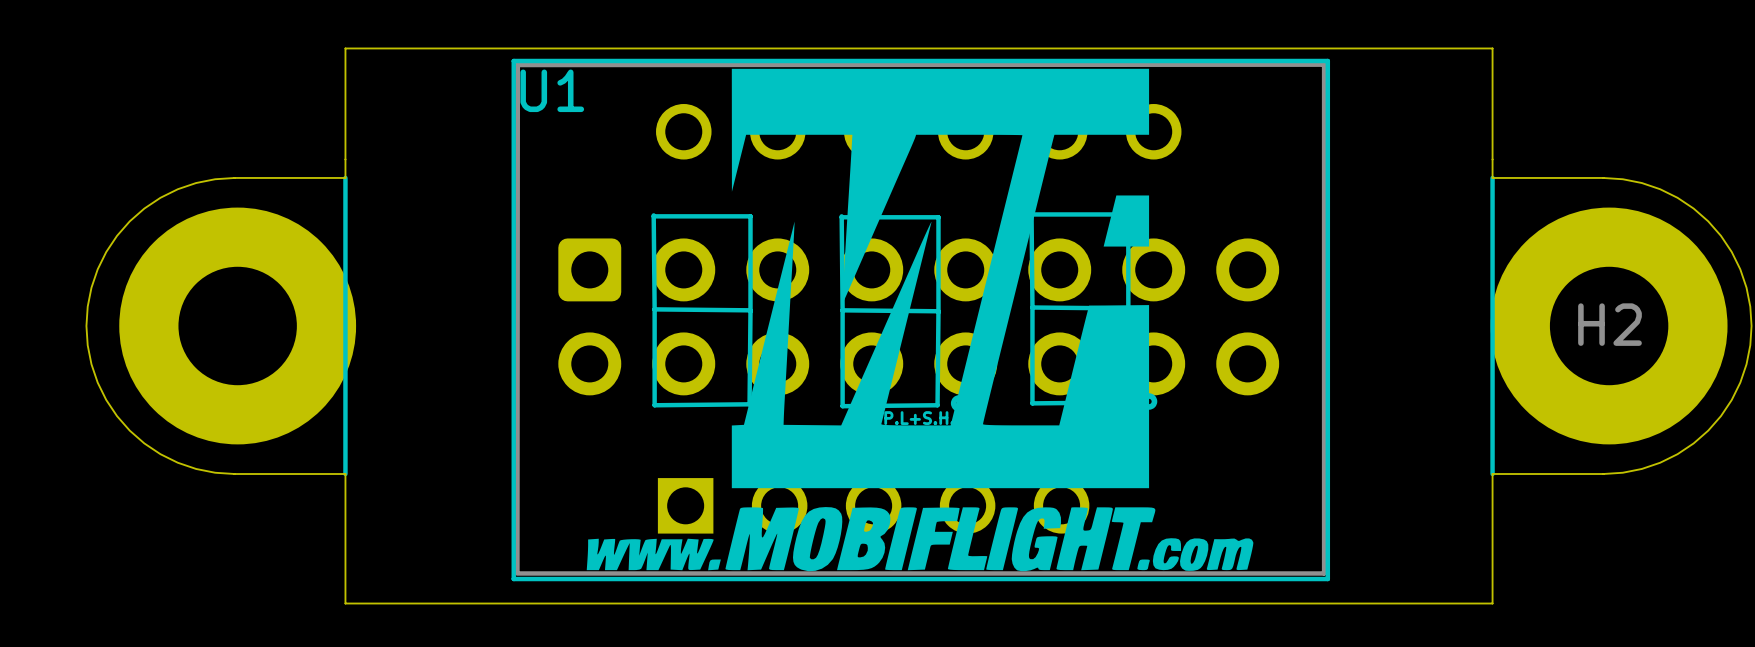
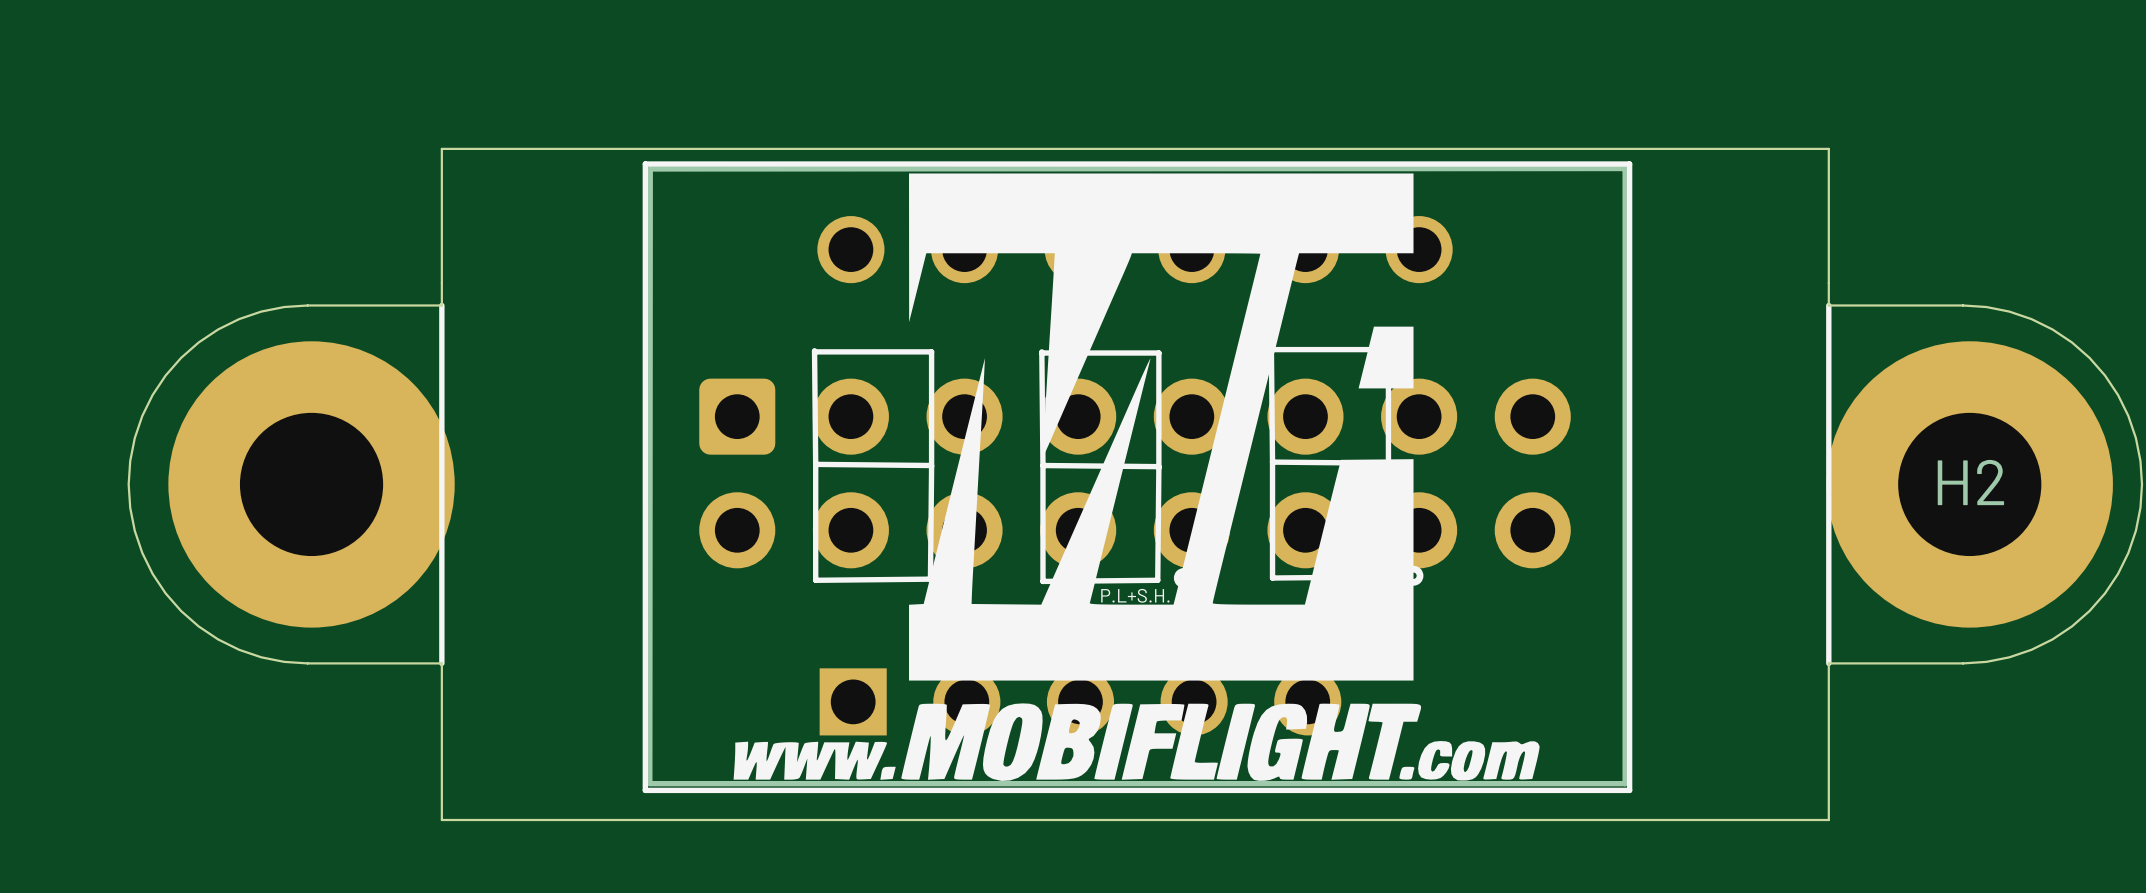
U1 name: U1 (552, 90) -> none

